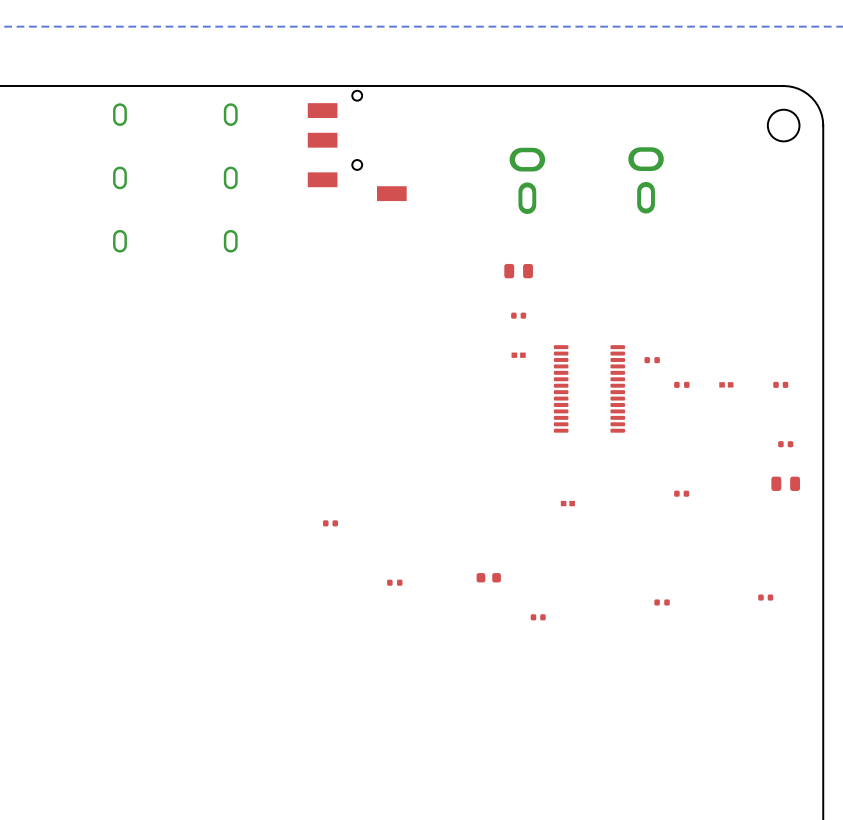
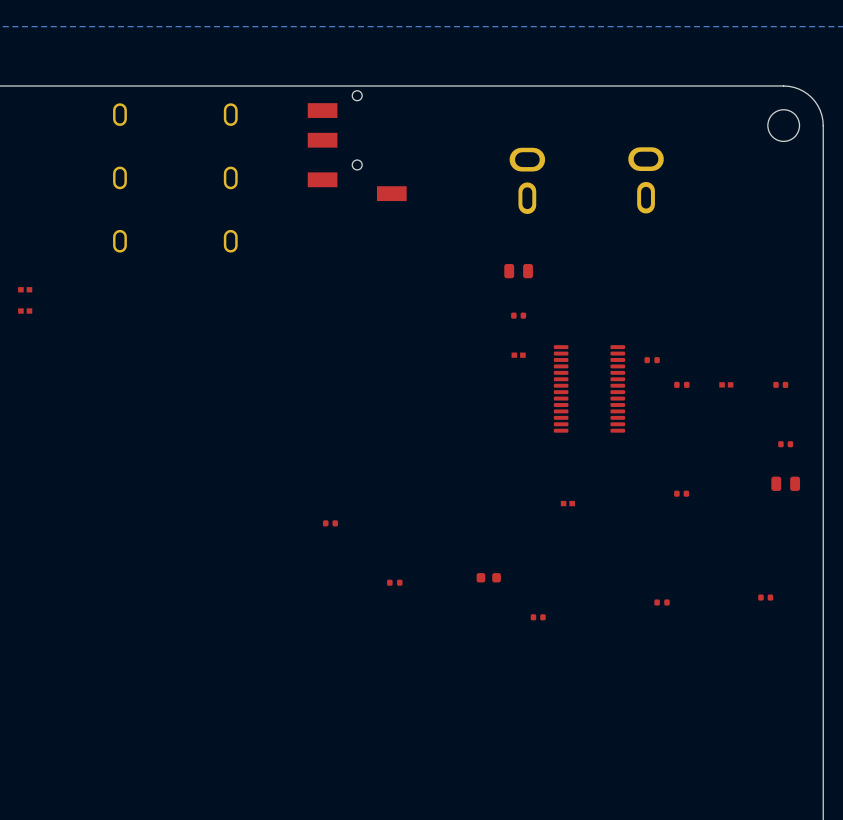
part: none -> (25, 289)
part: none -> (25, 311)

